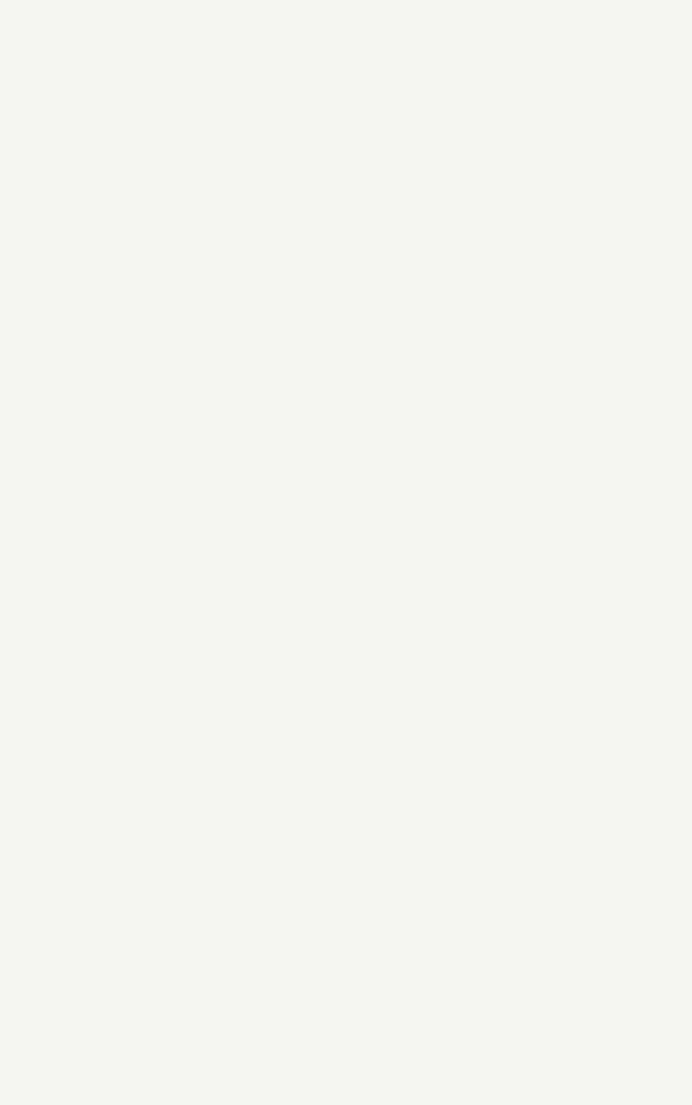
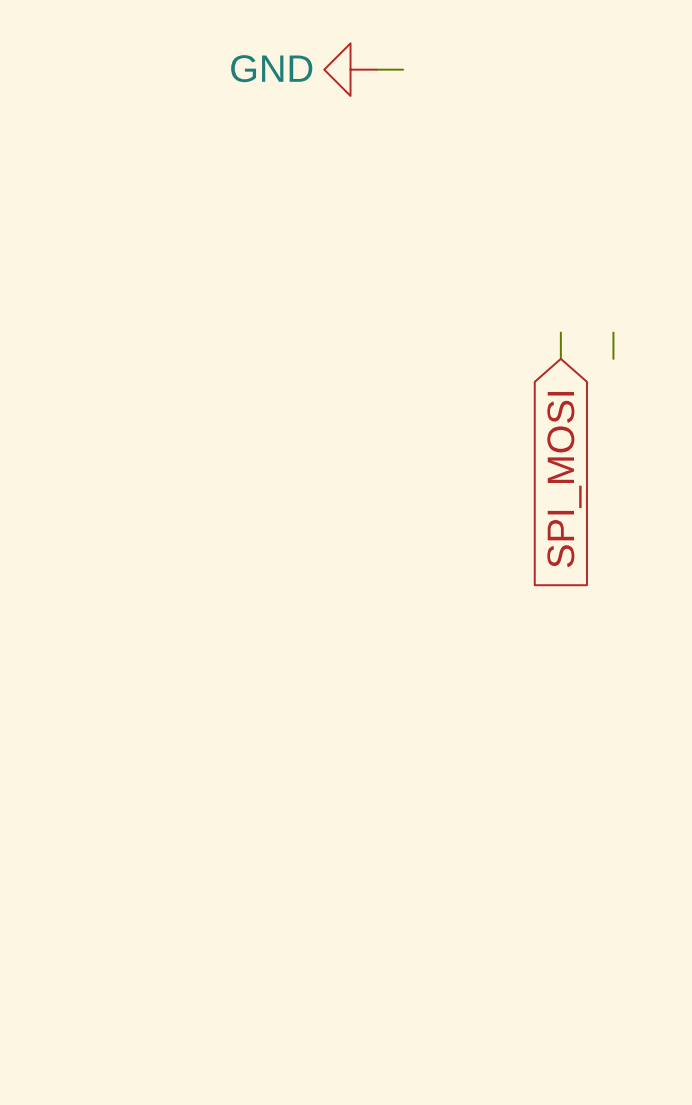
power symbol: none -> GND (350, 69)
wire: none -> (376, 69) (403, 69)
wire: none -> (560, 332) (560, 358)
wire: none -> (613, 332) (613, 358)
global label: none -> SPI_MOSI (564, 479)

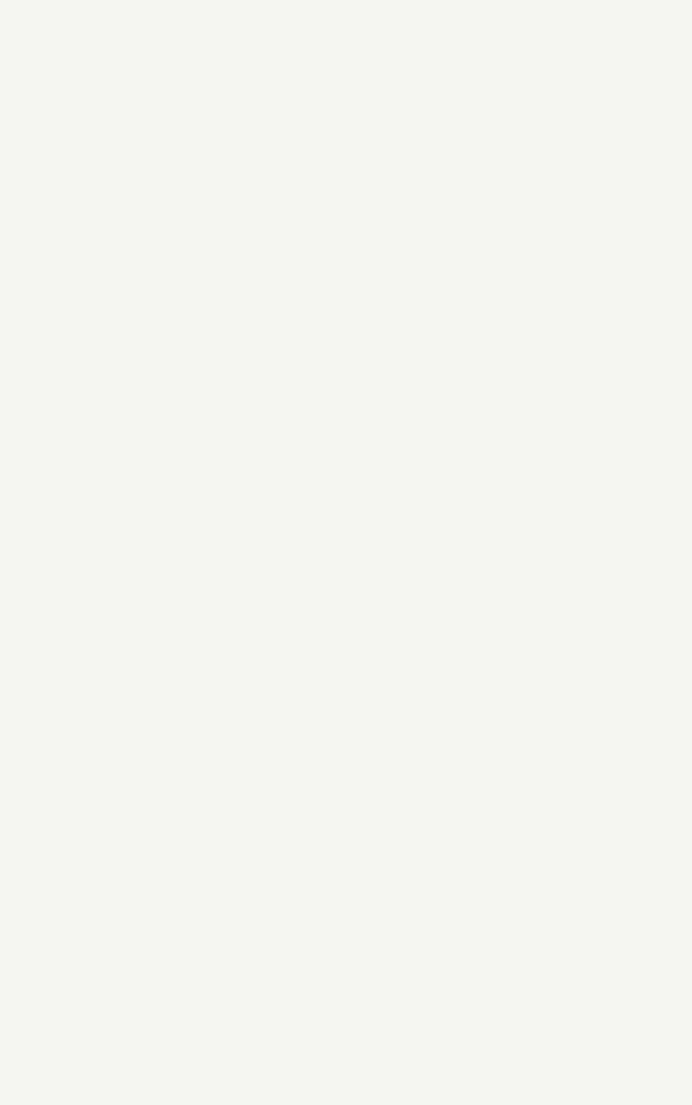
power symbol: GND (350, 69) -> none
wire: (376, 69) (403, 69) -> none
wire: (560, 332) (560, 358) -> none
wire: (613, 332) (613, 358) -> none
global label: SPI_MOSI (564, 479) -> none

